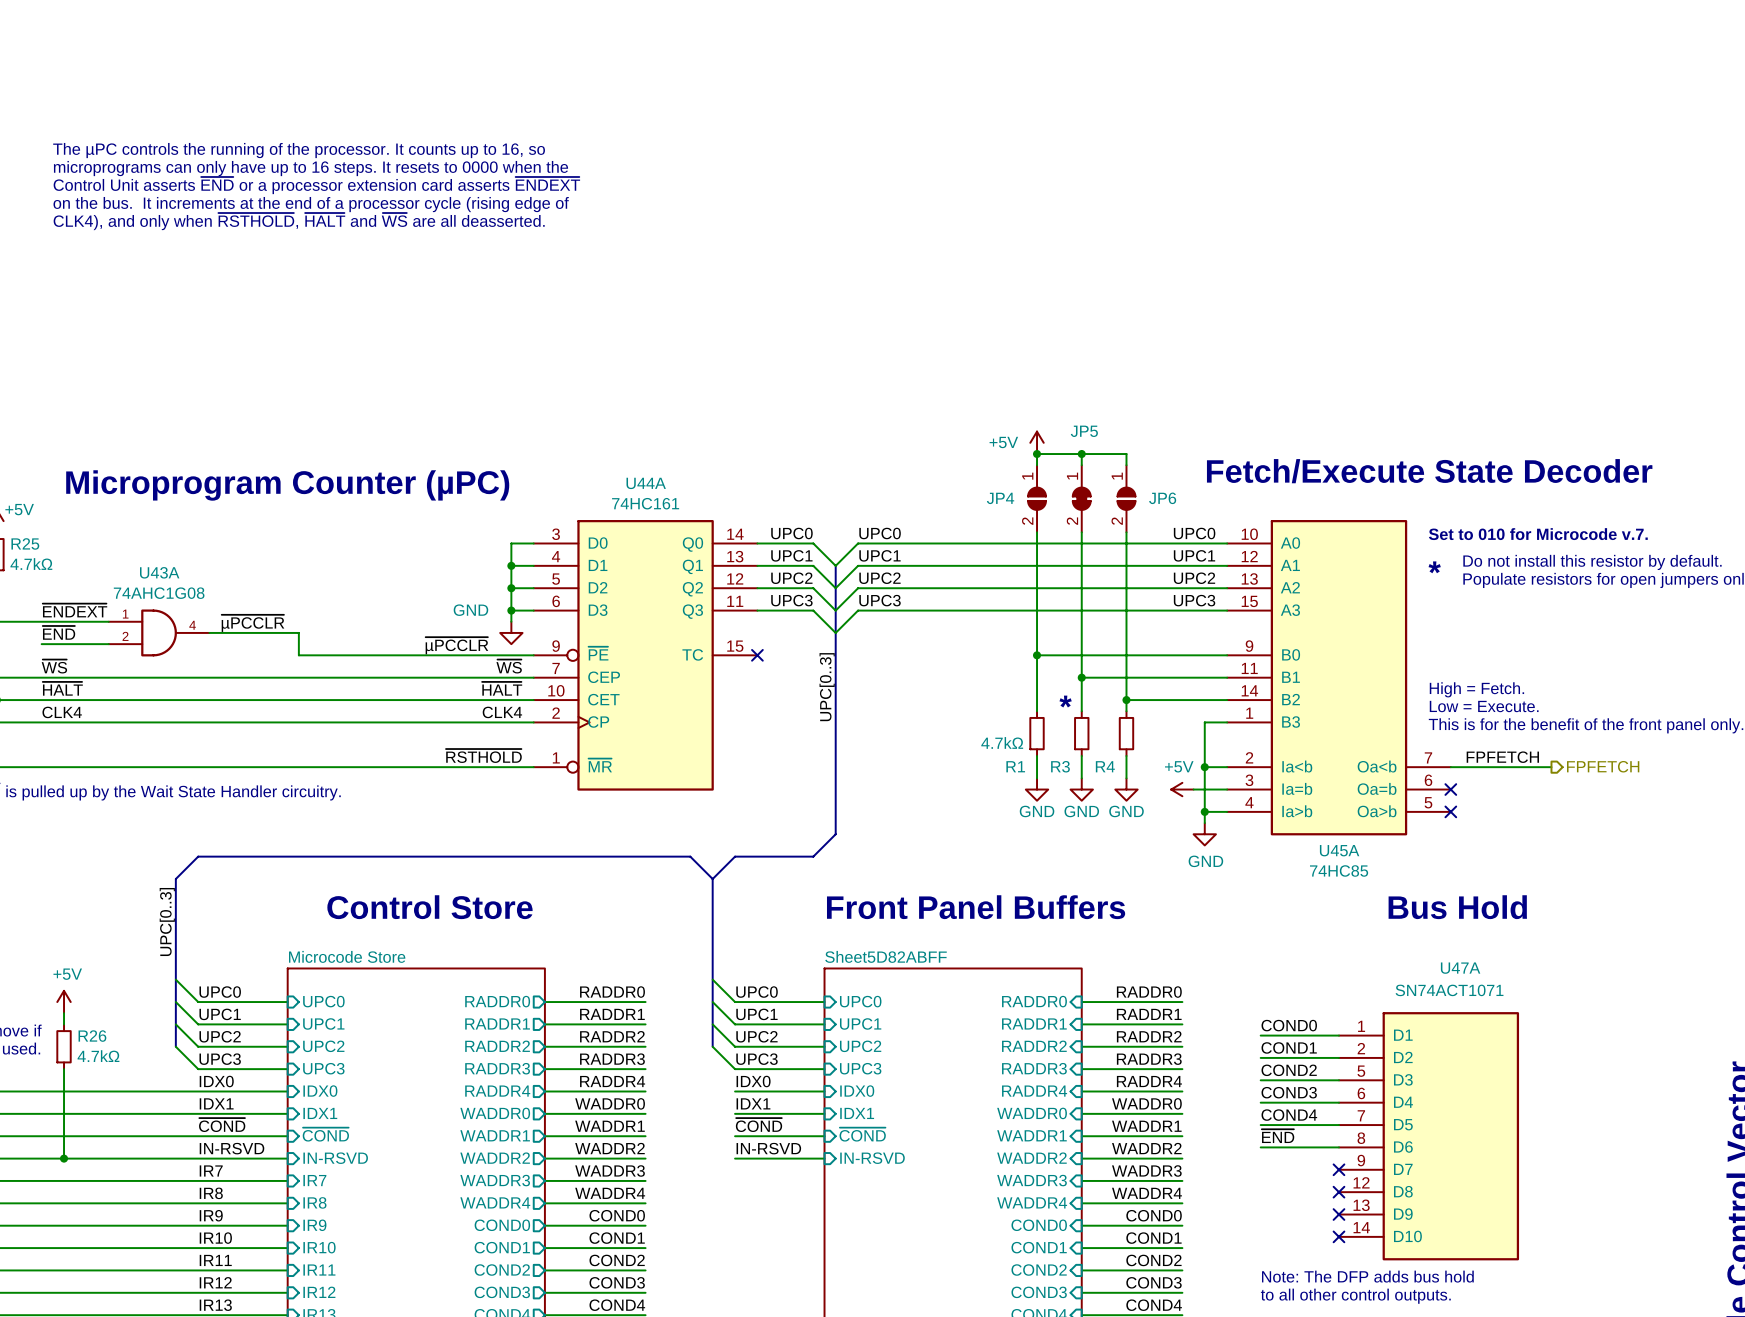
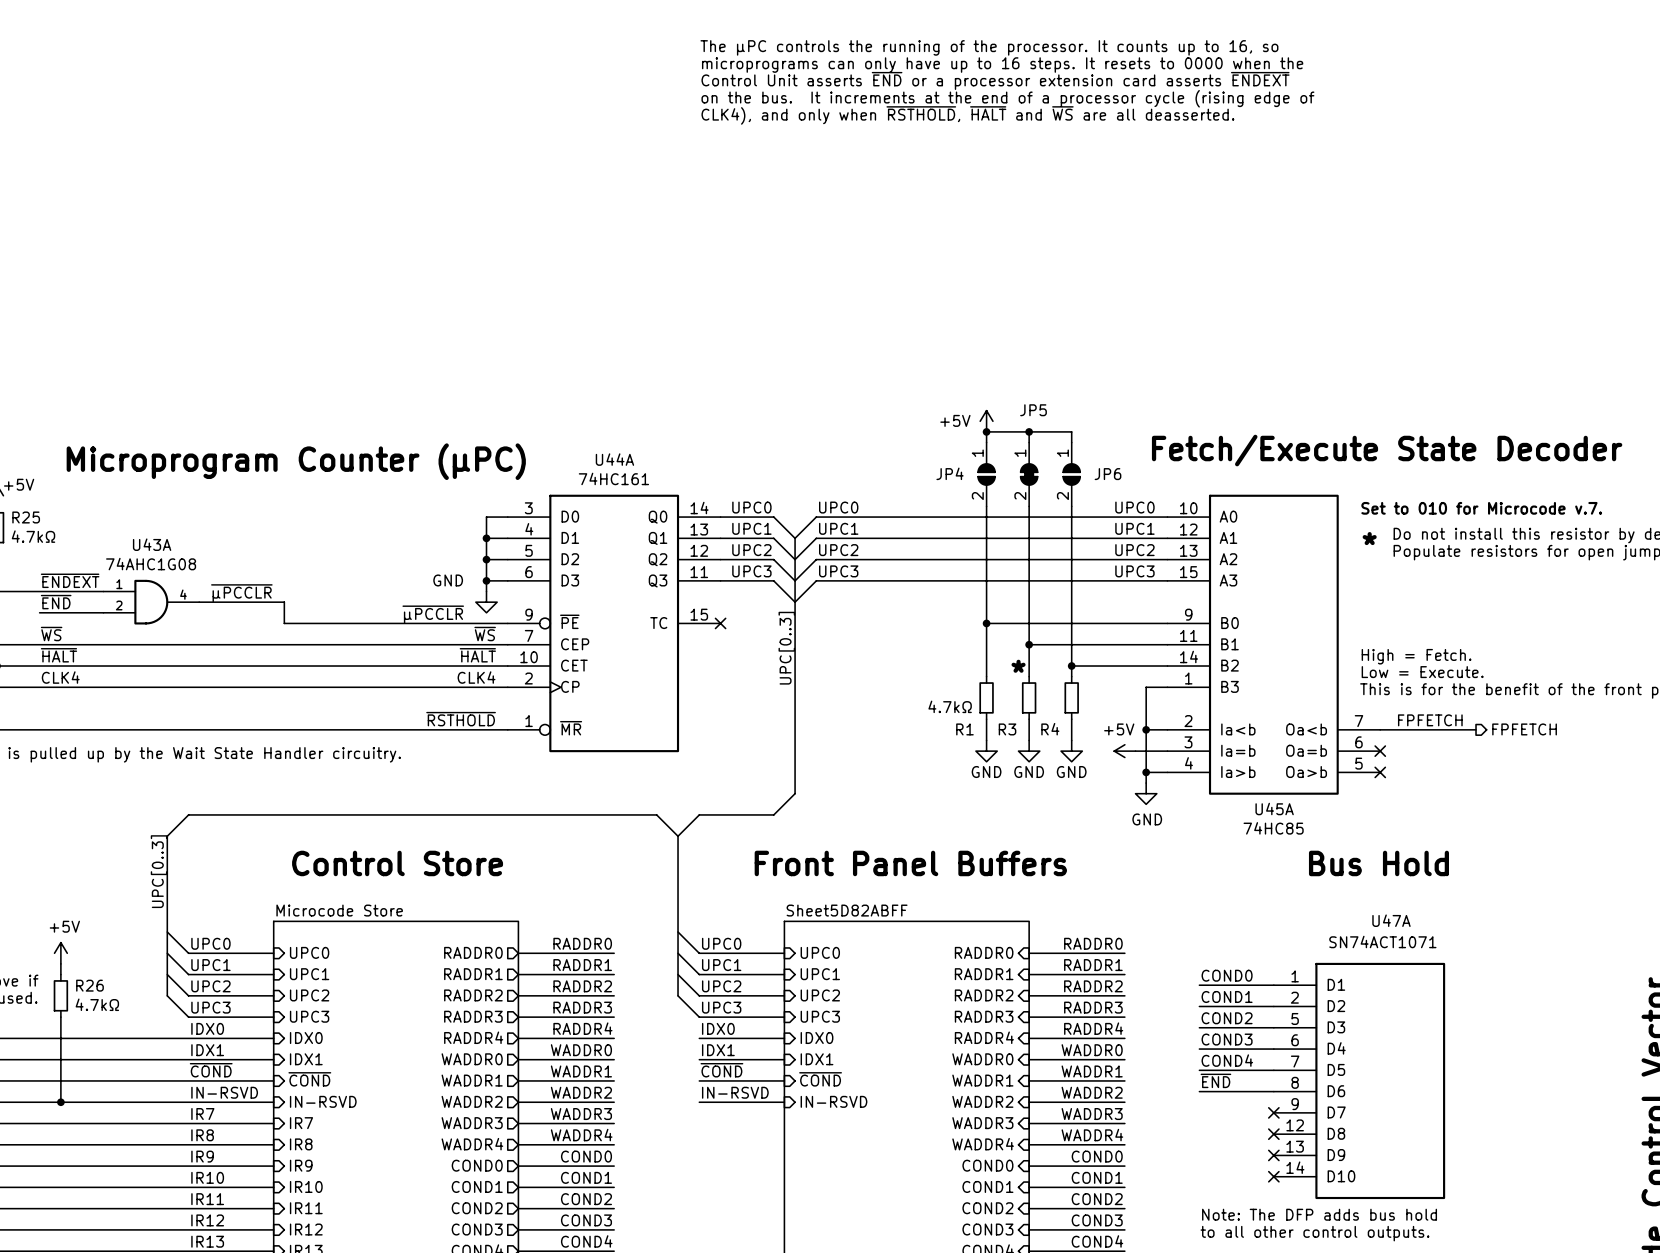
text: none -> The µPC controls the running of the processor. It counts up to 16, so (989, 47)
text: none -> microprograms can only have up to 16 steps. It resets to 0000 when the (1002, 65)
text: none -> Control Unit asserts ~{END} or a processor extension card asserts ~{ENDEXT} (995, 80)
text: none -> on the bus. It increments at the end of a processor cycle (rising edge of (1007, 98)
text: none -> CLK4), and only when ~{RSTHOLD}, ~{HALT} and ~{WS} are all deasserted. (967, 115)
text: The µPC controls the running of the processor. It counts up to 16, so (299, 150) -> none
text: microprograms can only have up to 16 steps. It resets to 0000 when the (310, 168) -> none
text: Control Unit asserts ~{END} or a processor extension card asserts ~{ENDEXT} (316, 185) -> none
text: on the bus. It increments at the end of a processor cycle (rising edge of (311, 204) -> none
text: CLK4), and only when ~{RSTHOLD}, ~{HALT} and ~{WS} are all deasserted. (299, 221) -> none

